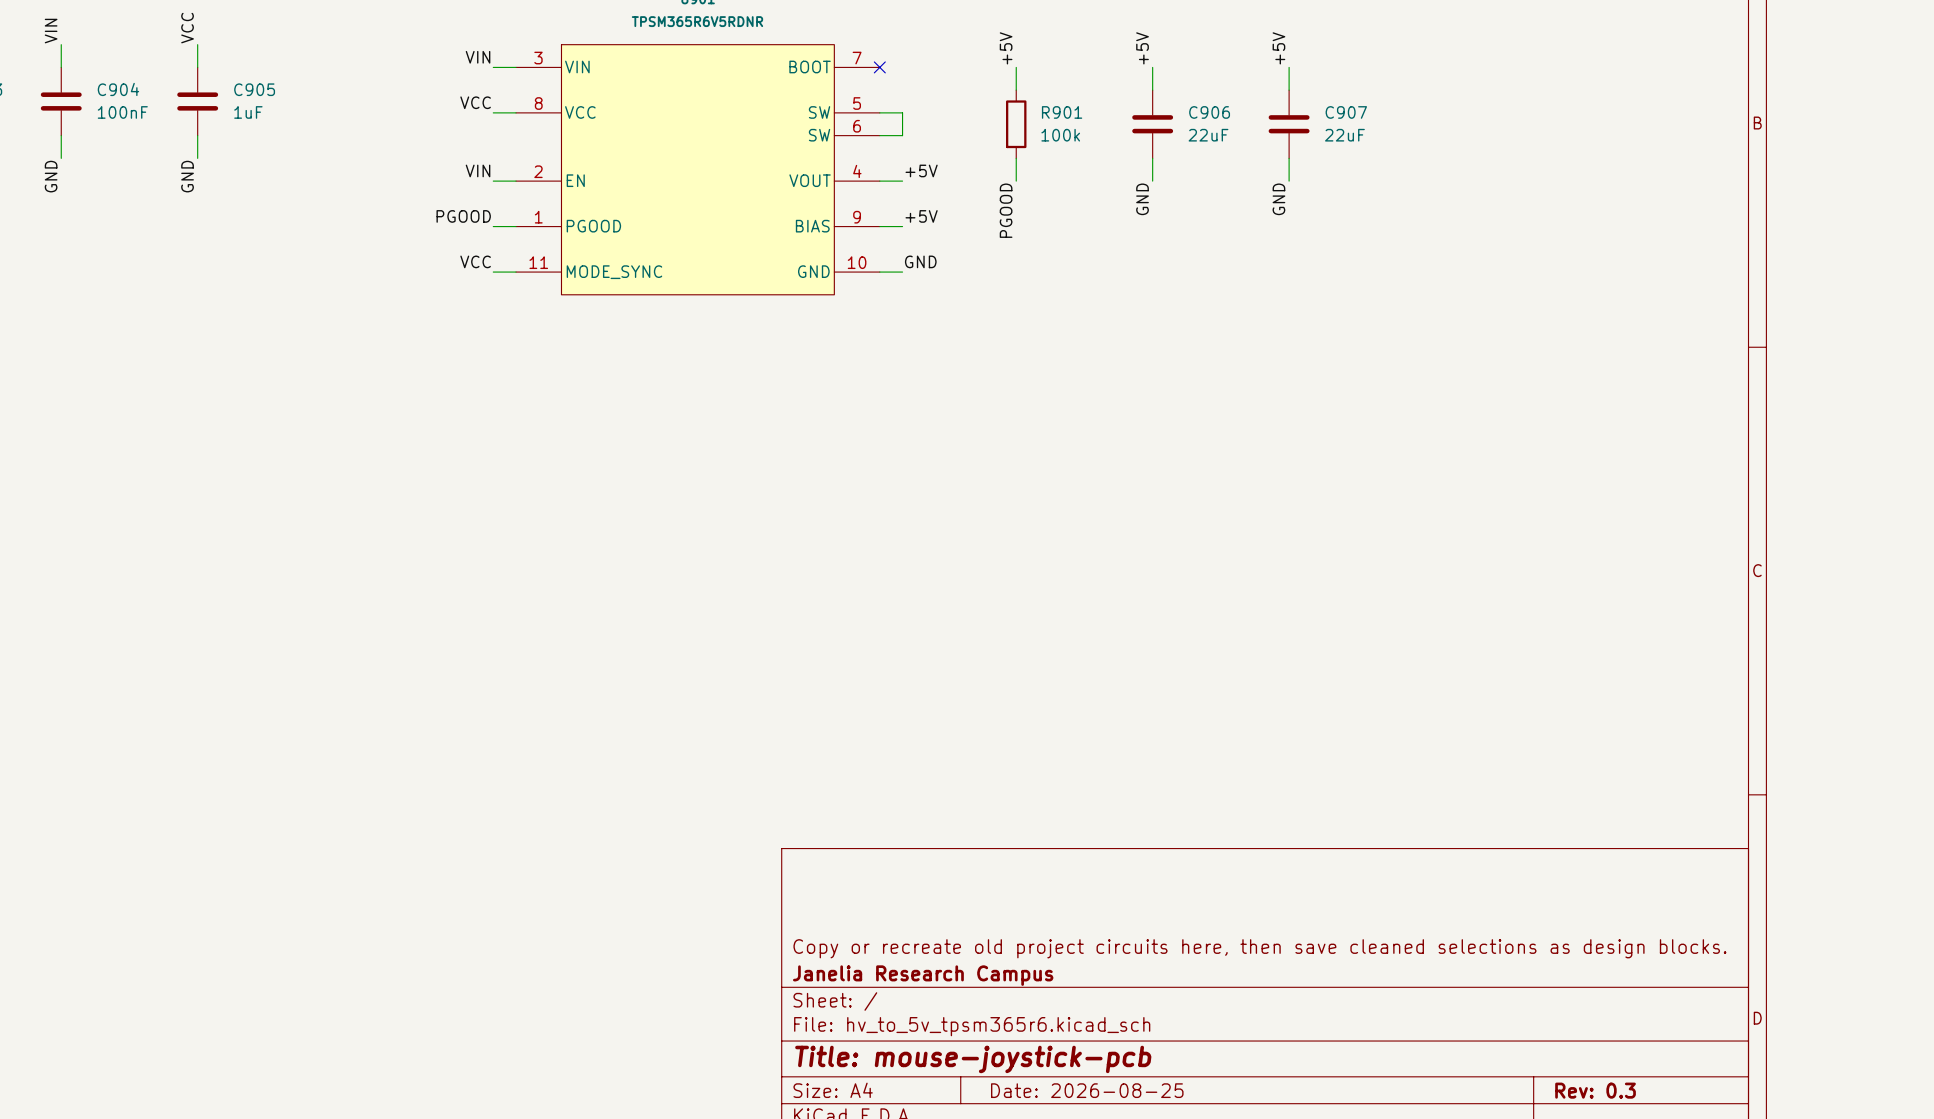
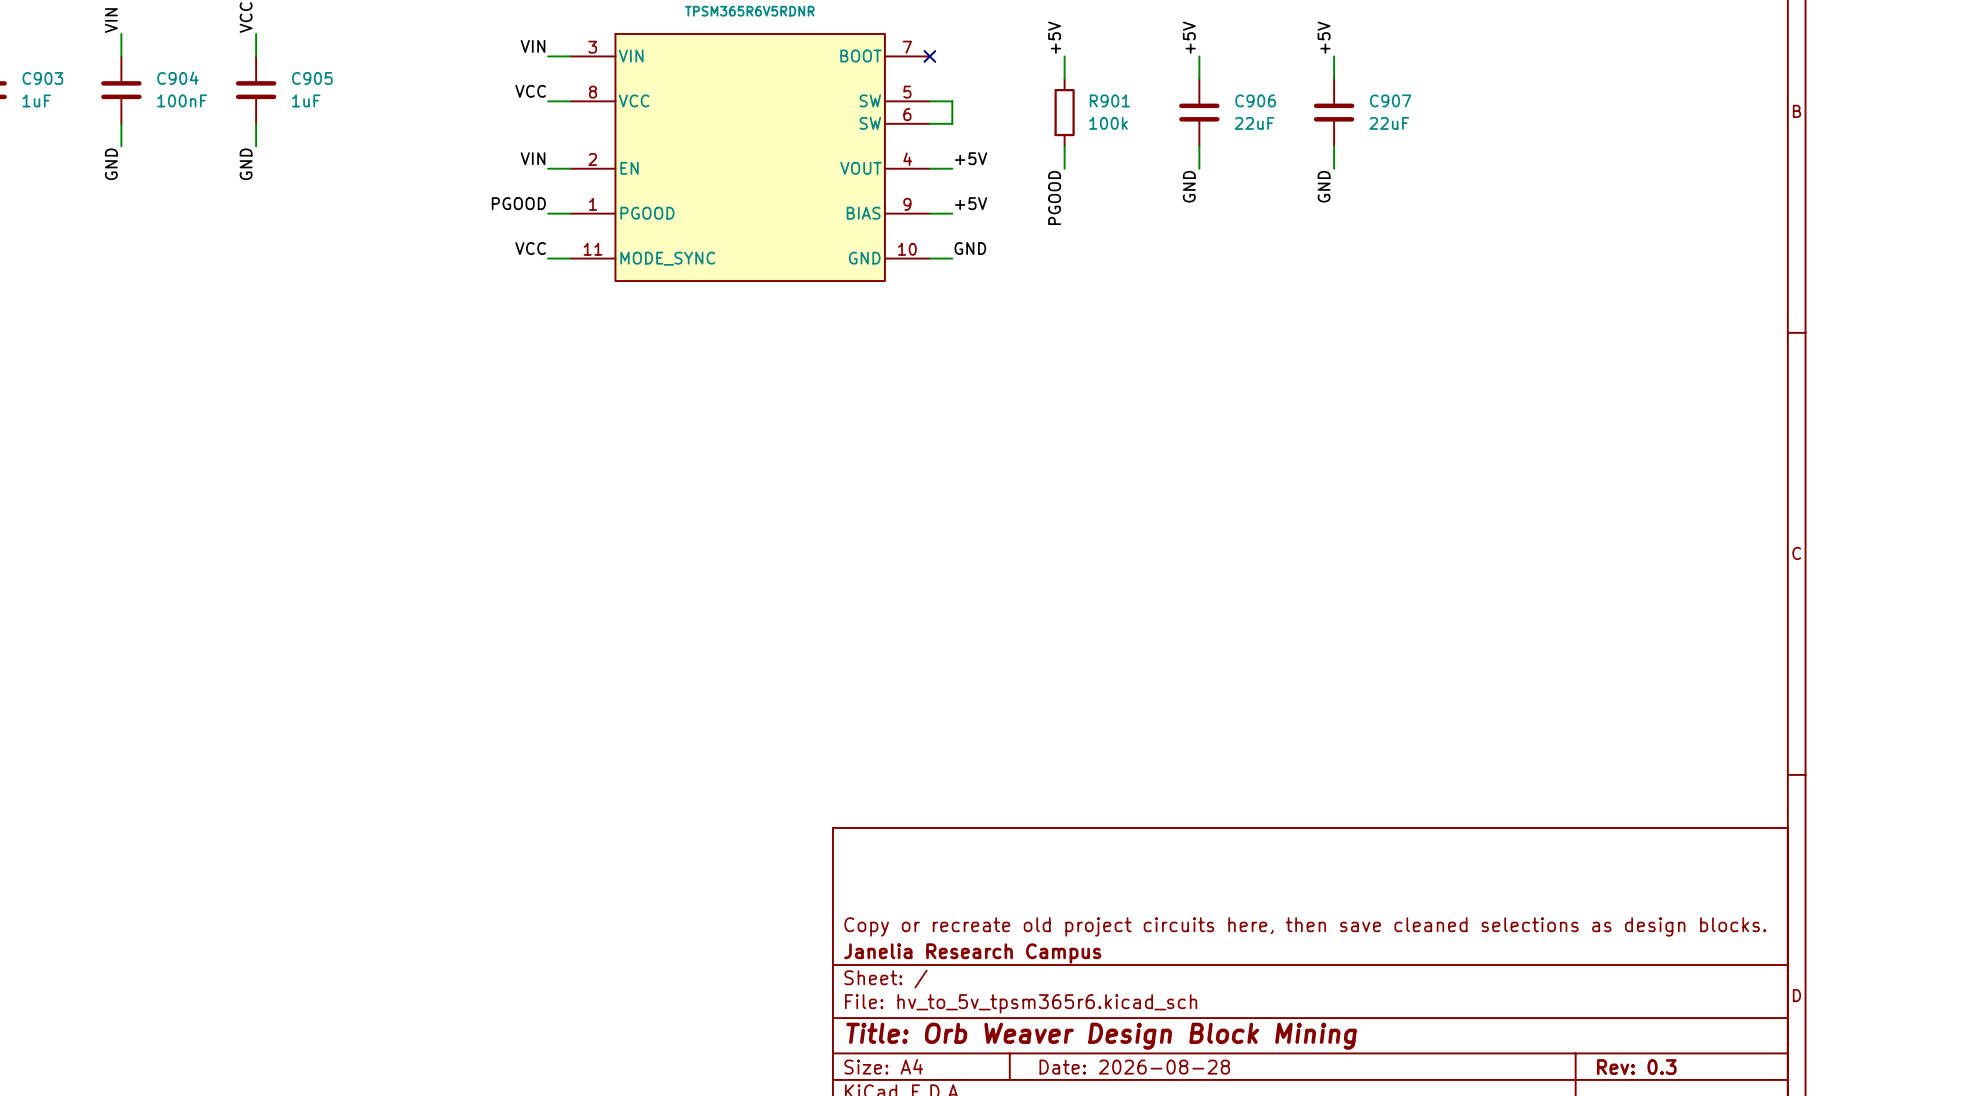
title block: Title: mouse-joystick-pcb (973, 1059) -> Title: Orb Weaver Design Block Mining (1101, 1036)
title block: Date: 2026-08-25 (1087, 1090) -> Date: 2026-08-28 (1134, 1067)

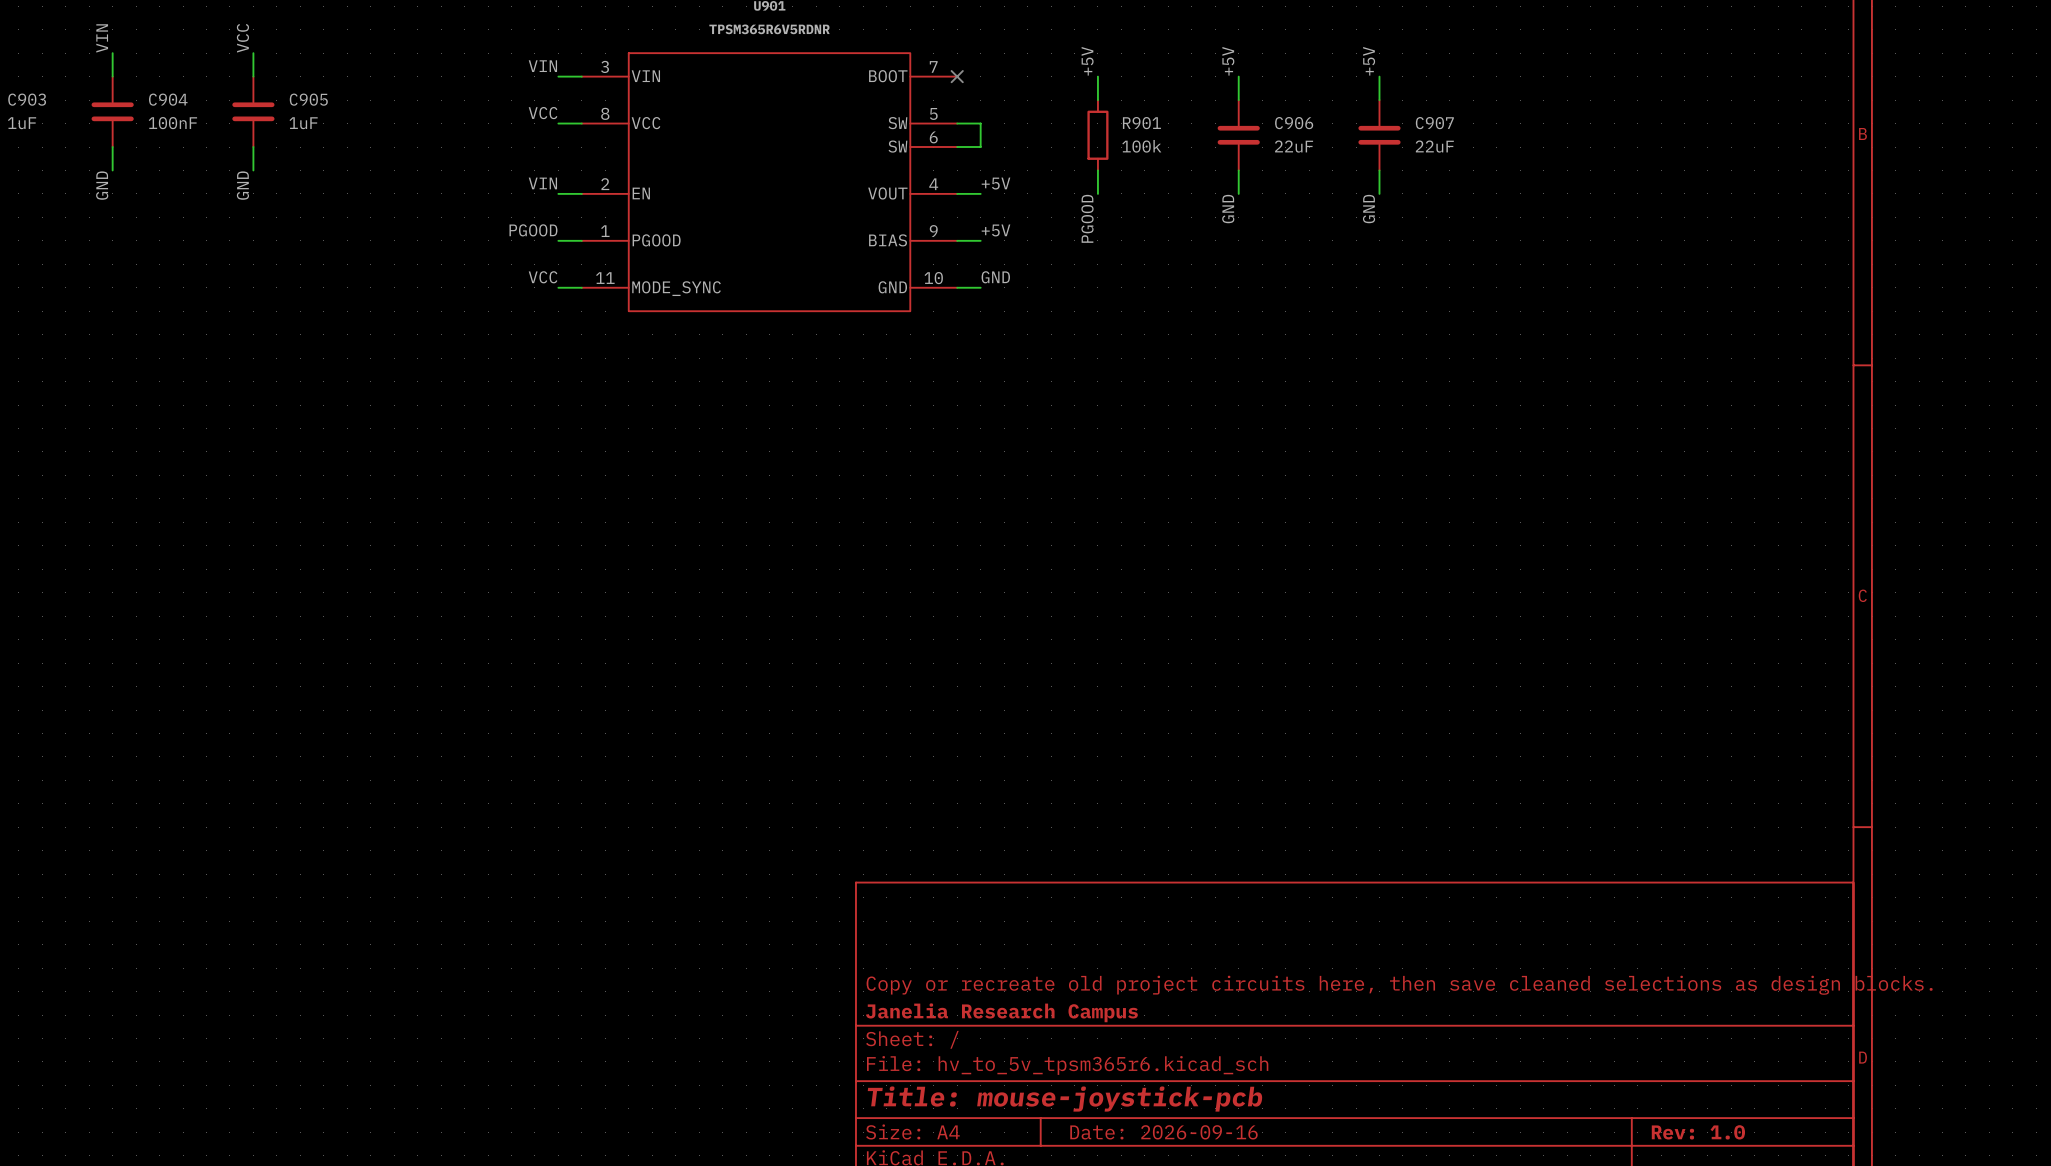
title block: Title: Orb Weaver Design Block Mining (1101, 1036) -> Title: mouse-joystick-pcb (1065, 1099)
title block: Date: 2026-08-28 (1134, 1067) -> Date: 2026-09-16 (1163, 1132)
title block: Rev: 0.3 (1636, 1067) -> Rev: 1.0 (1698, 1132)

